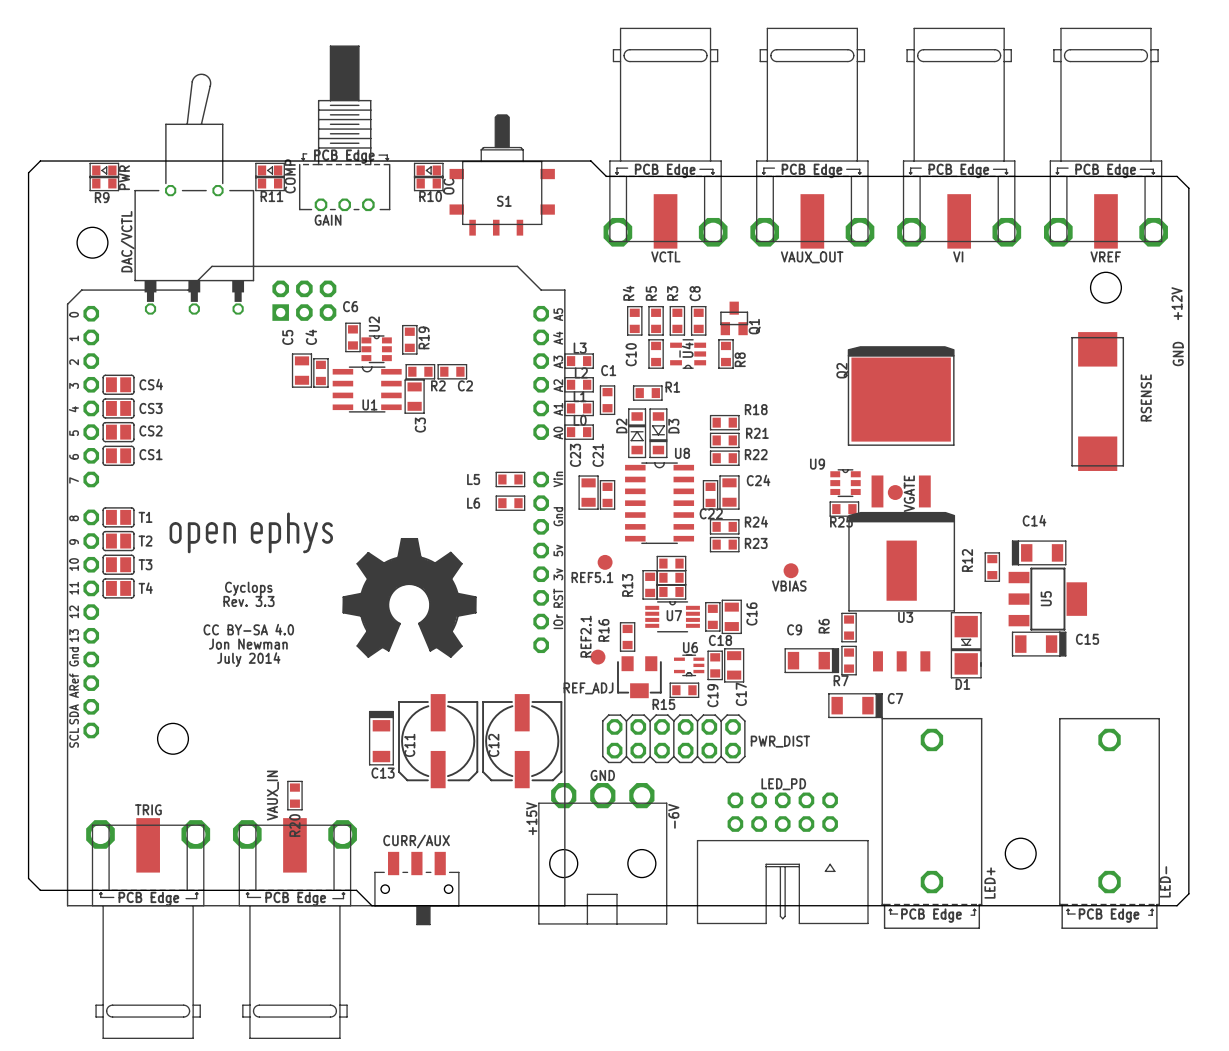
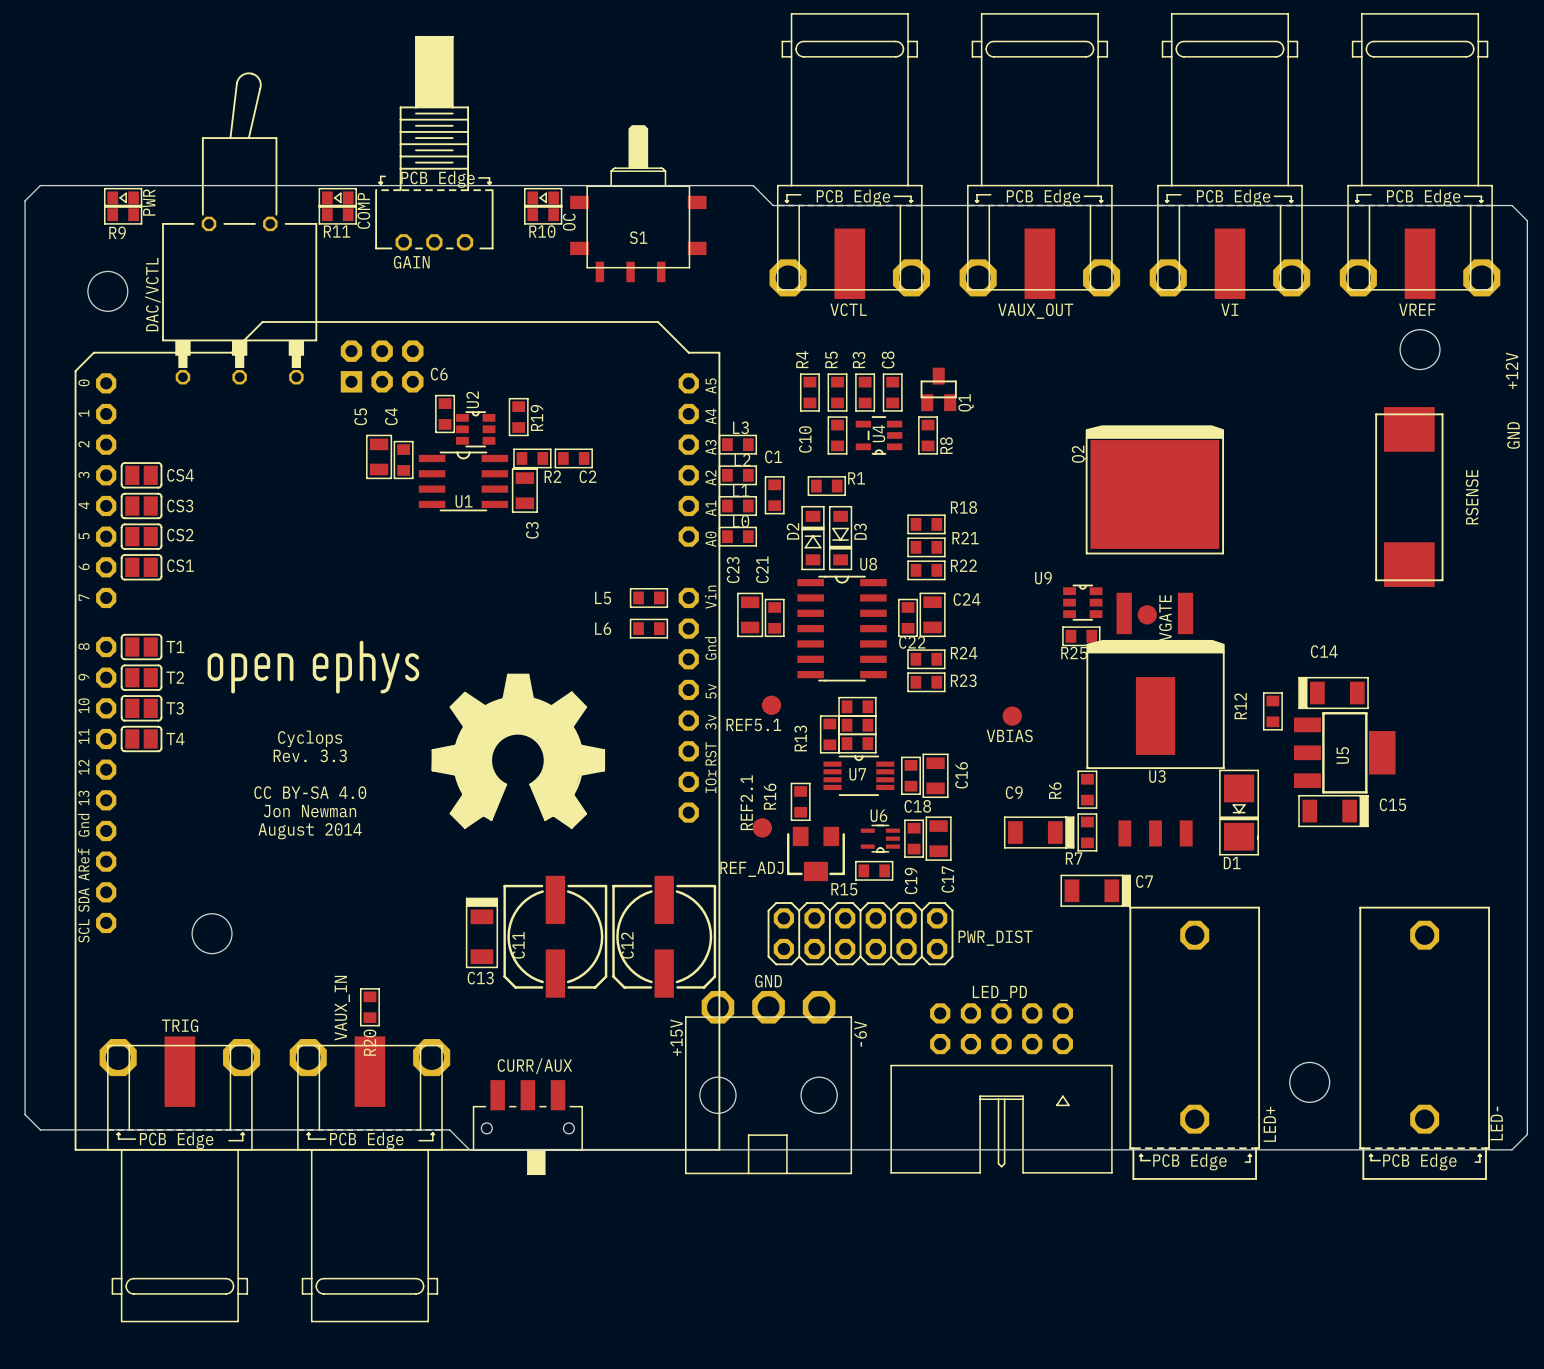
text: July 2014 (248, 659) -> August 2014 (310, 831)

